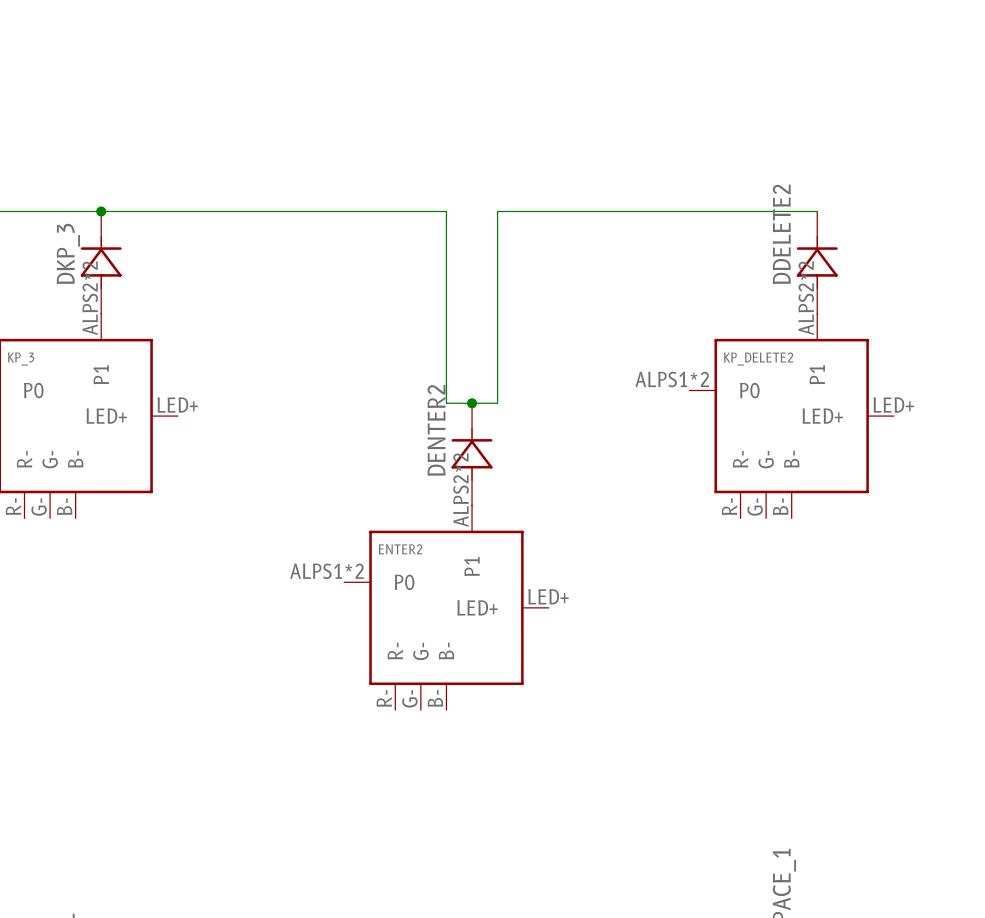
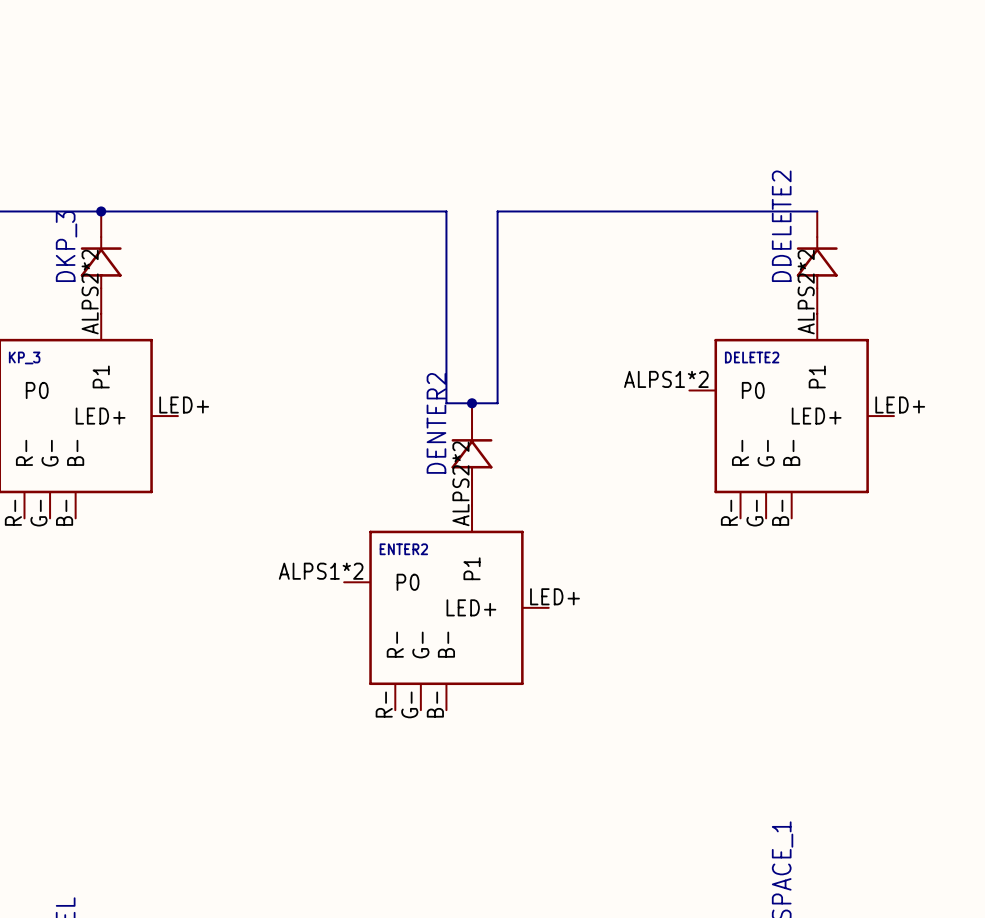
KP_DELETE2 name: KP_DELETE2 (758, 358) -> DELETE2 (752, 357)

